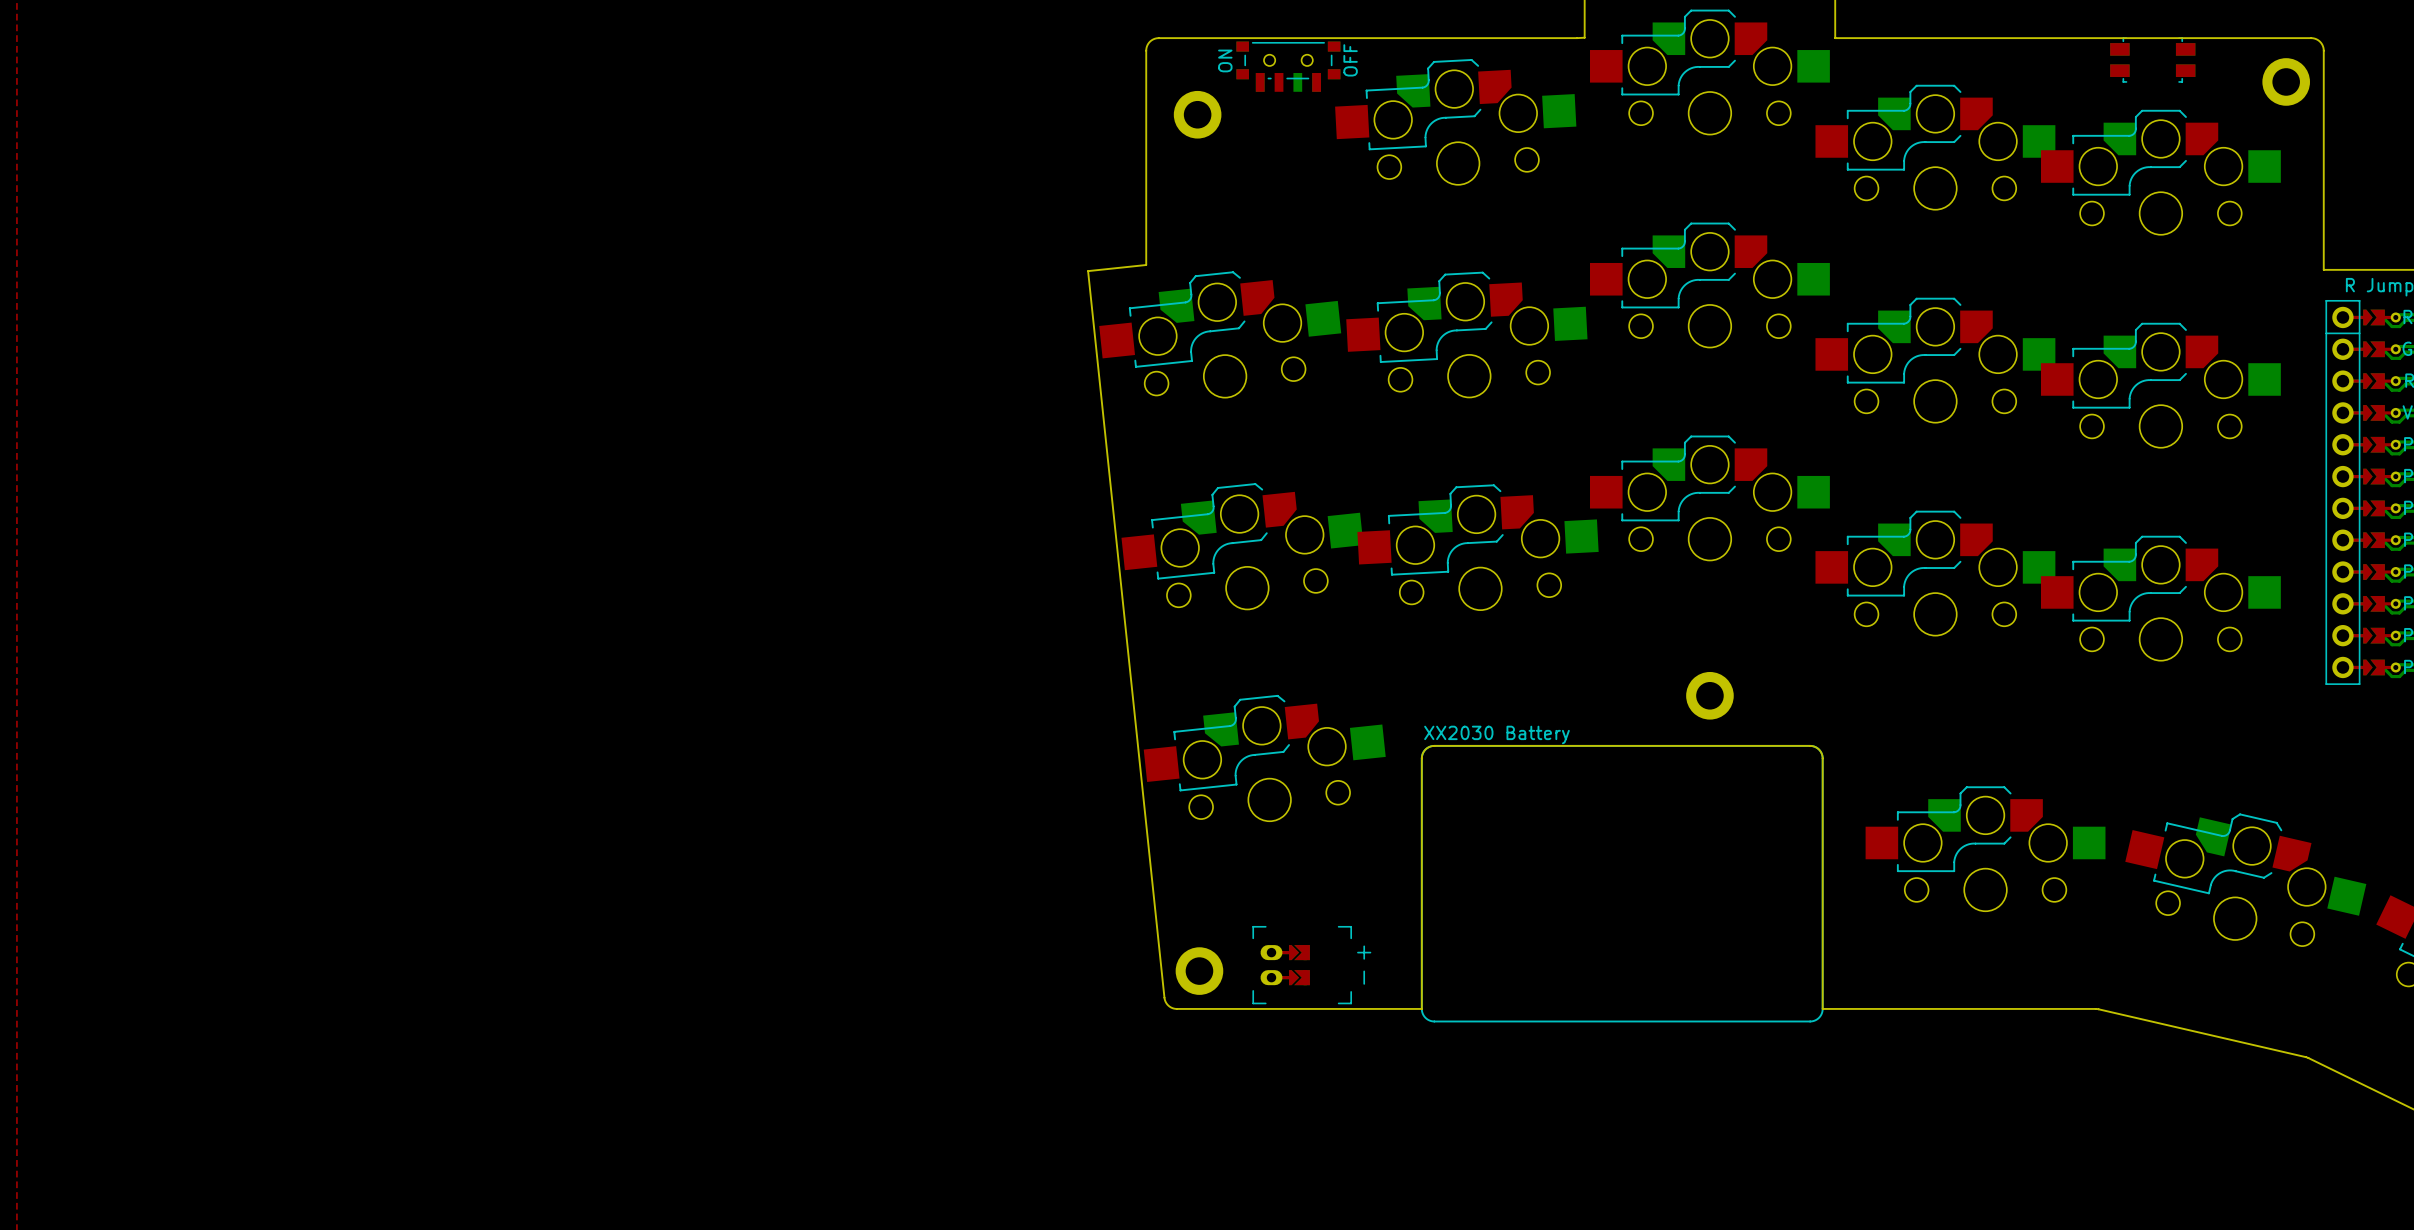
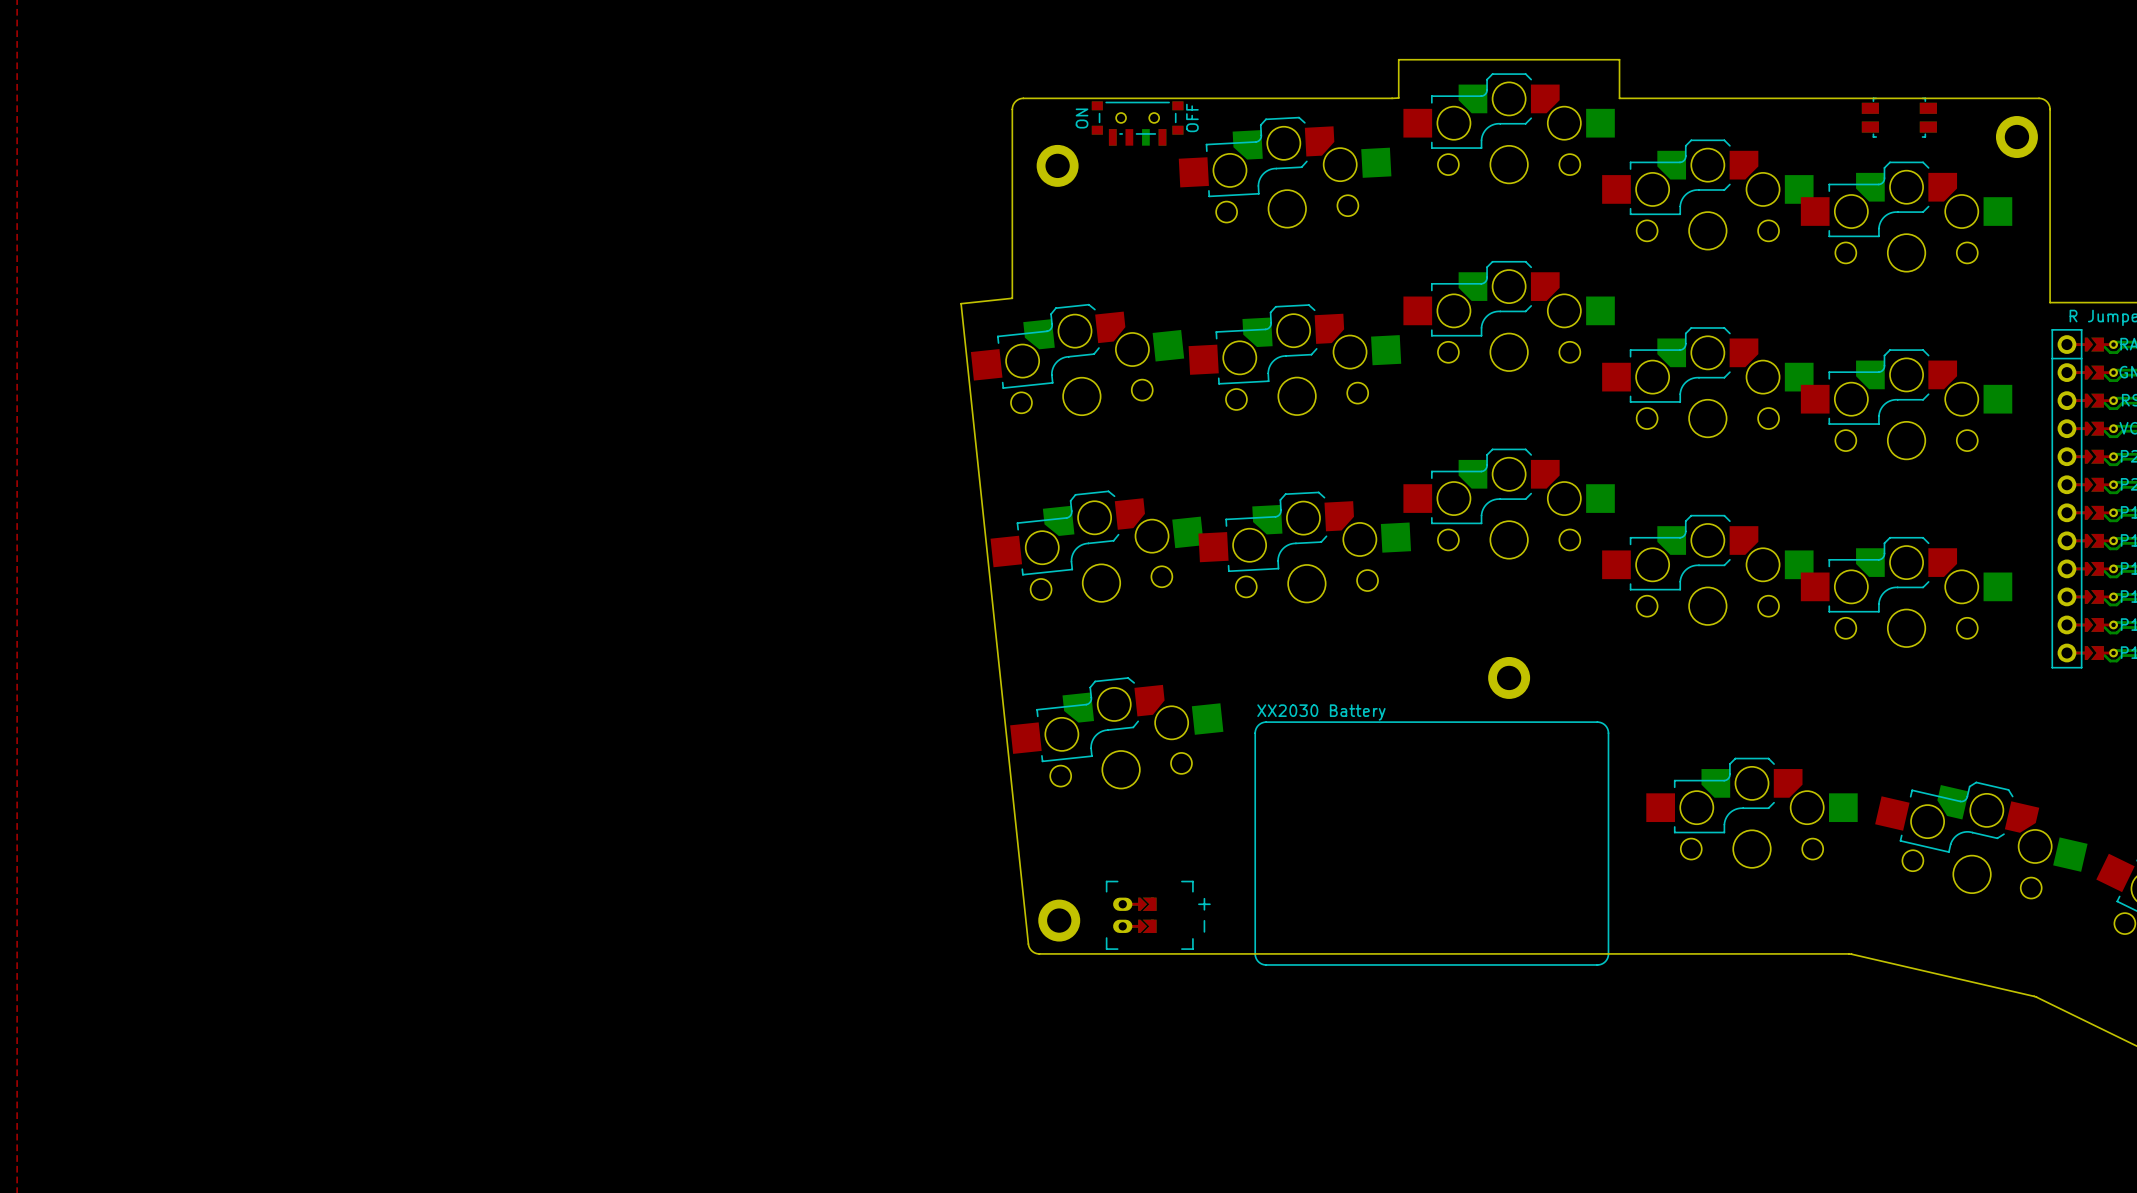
board edge: (1421, 1008) (1421, 758) (1425, 749) (1434, 745) (1810, 745) (1816, 747) (1821, 752) (1822, 758) (1822, 1008) -> (1255, 953) (1608, 953)

